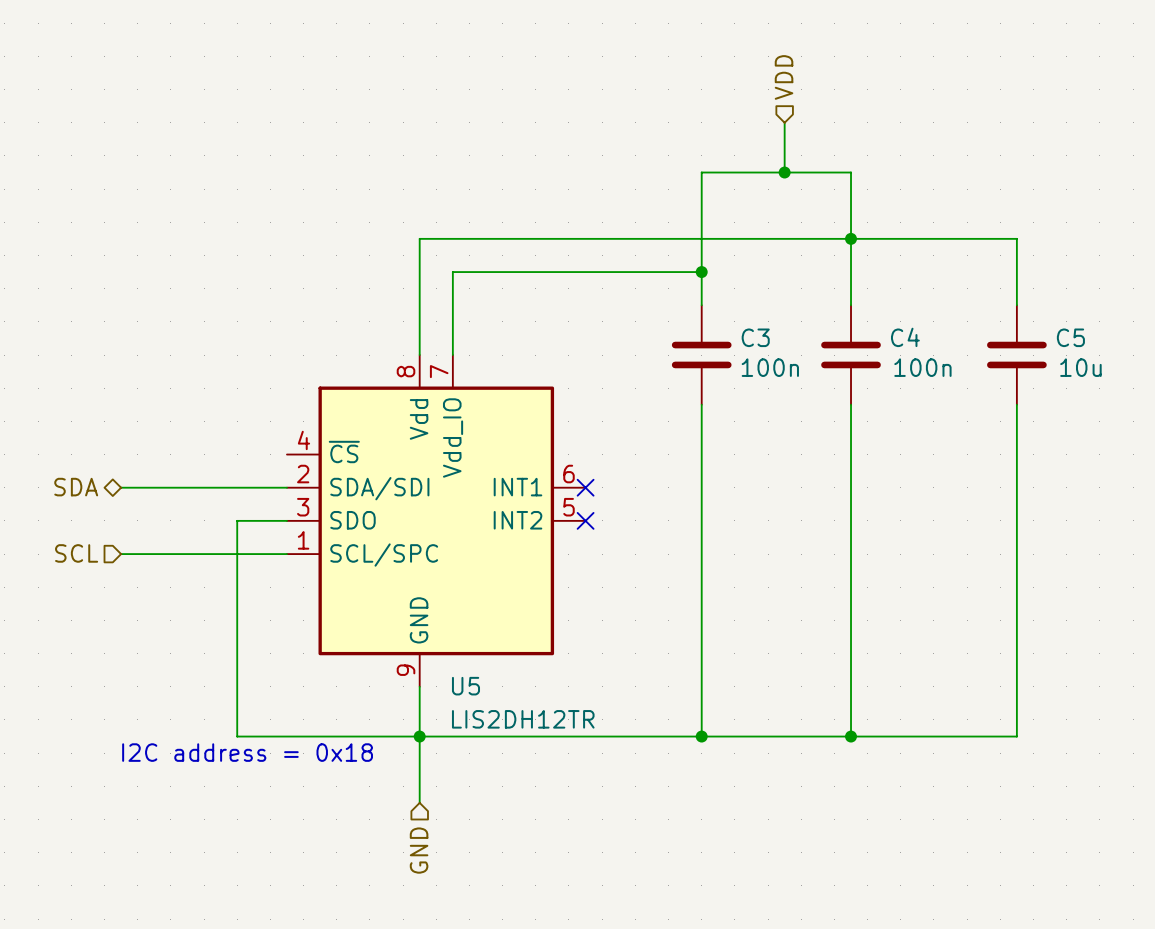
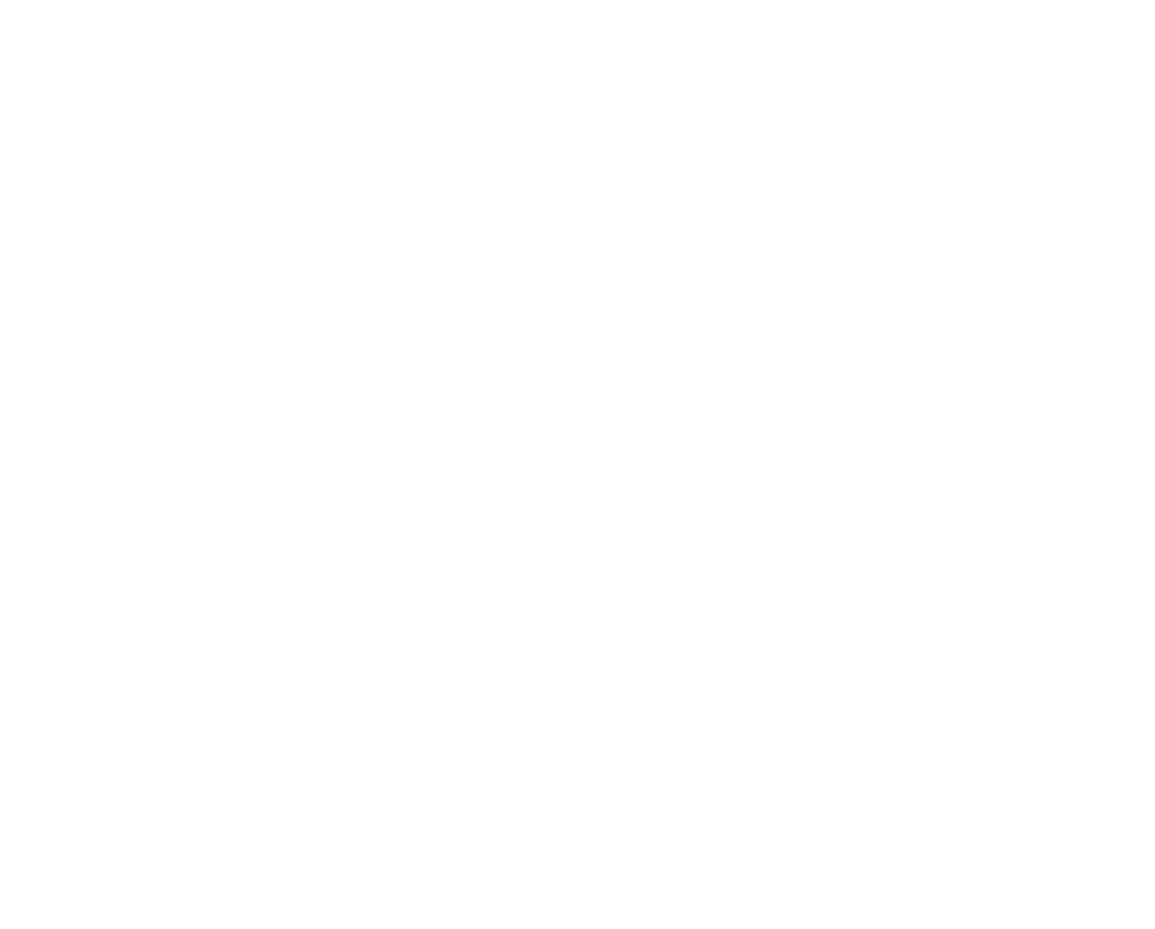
hierarchical label: VDD (784, 77) -> none
wire: (784, 122) (784, 172) -> none
junction: (784, 172) -> none
junction: (851, 238) -> none
wire: (701, 272) (452, 272) (452, 355) -> none
junction: (701, 272) -> none
wire: (701, 305) (701, 172) (851, 172) (851, 305) -> none
wire: (1016, 305) (1016, 238) (419, 238) (419, 355) -> none
C3: 100n (701, 355) -> none
C4: 100n (851, 355) -> none
C5: 10u (1016, 355) -> none
wire: (701, 404) (701, 736) -> none
wire: (851, 404) (851, 736) -> none
wire: (1016, 404) (1016, 736) (237, 736) (237, 520) (286, 520) -> none
hierarchical label: SDA (76, 487) -> none
wire: (121, 487) (286, 487) -> none
no-connect mark: (585, 487) -> none
U5: LIS2DH12TR (436, 520) -> none
no-connect mark: (585, 520) -> none
hierarchical label: SCL (76, 553) -> none
wire: (121, 554) (286, 554) -> none
wire: (419, 686) (419, 802) -> none
junction: (419, 736) -> none
junction: (701, 736) -> none
junction: (851, 736) -> none
text: I2C address = 0x18 (247, 752) -> none
hierarchical label: GND (419, 850) -> none

